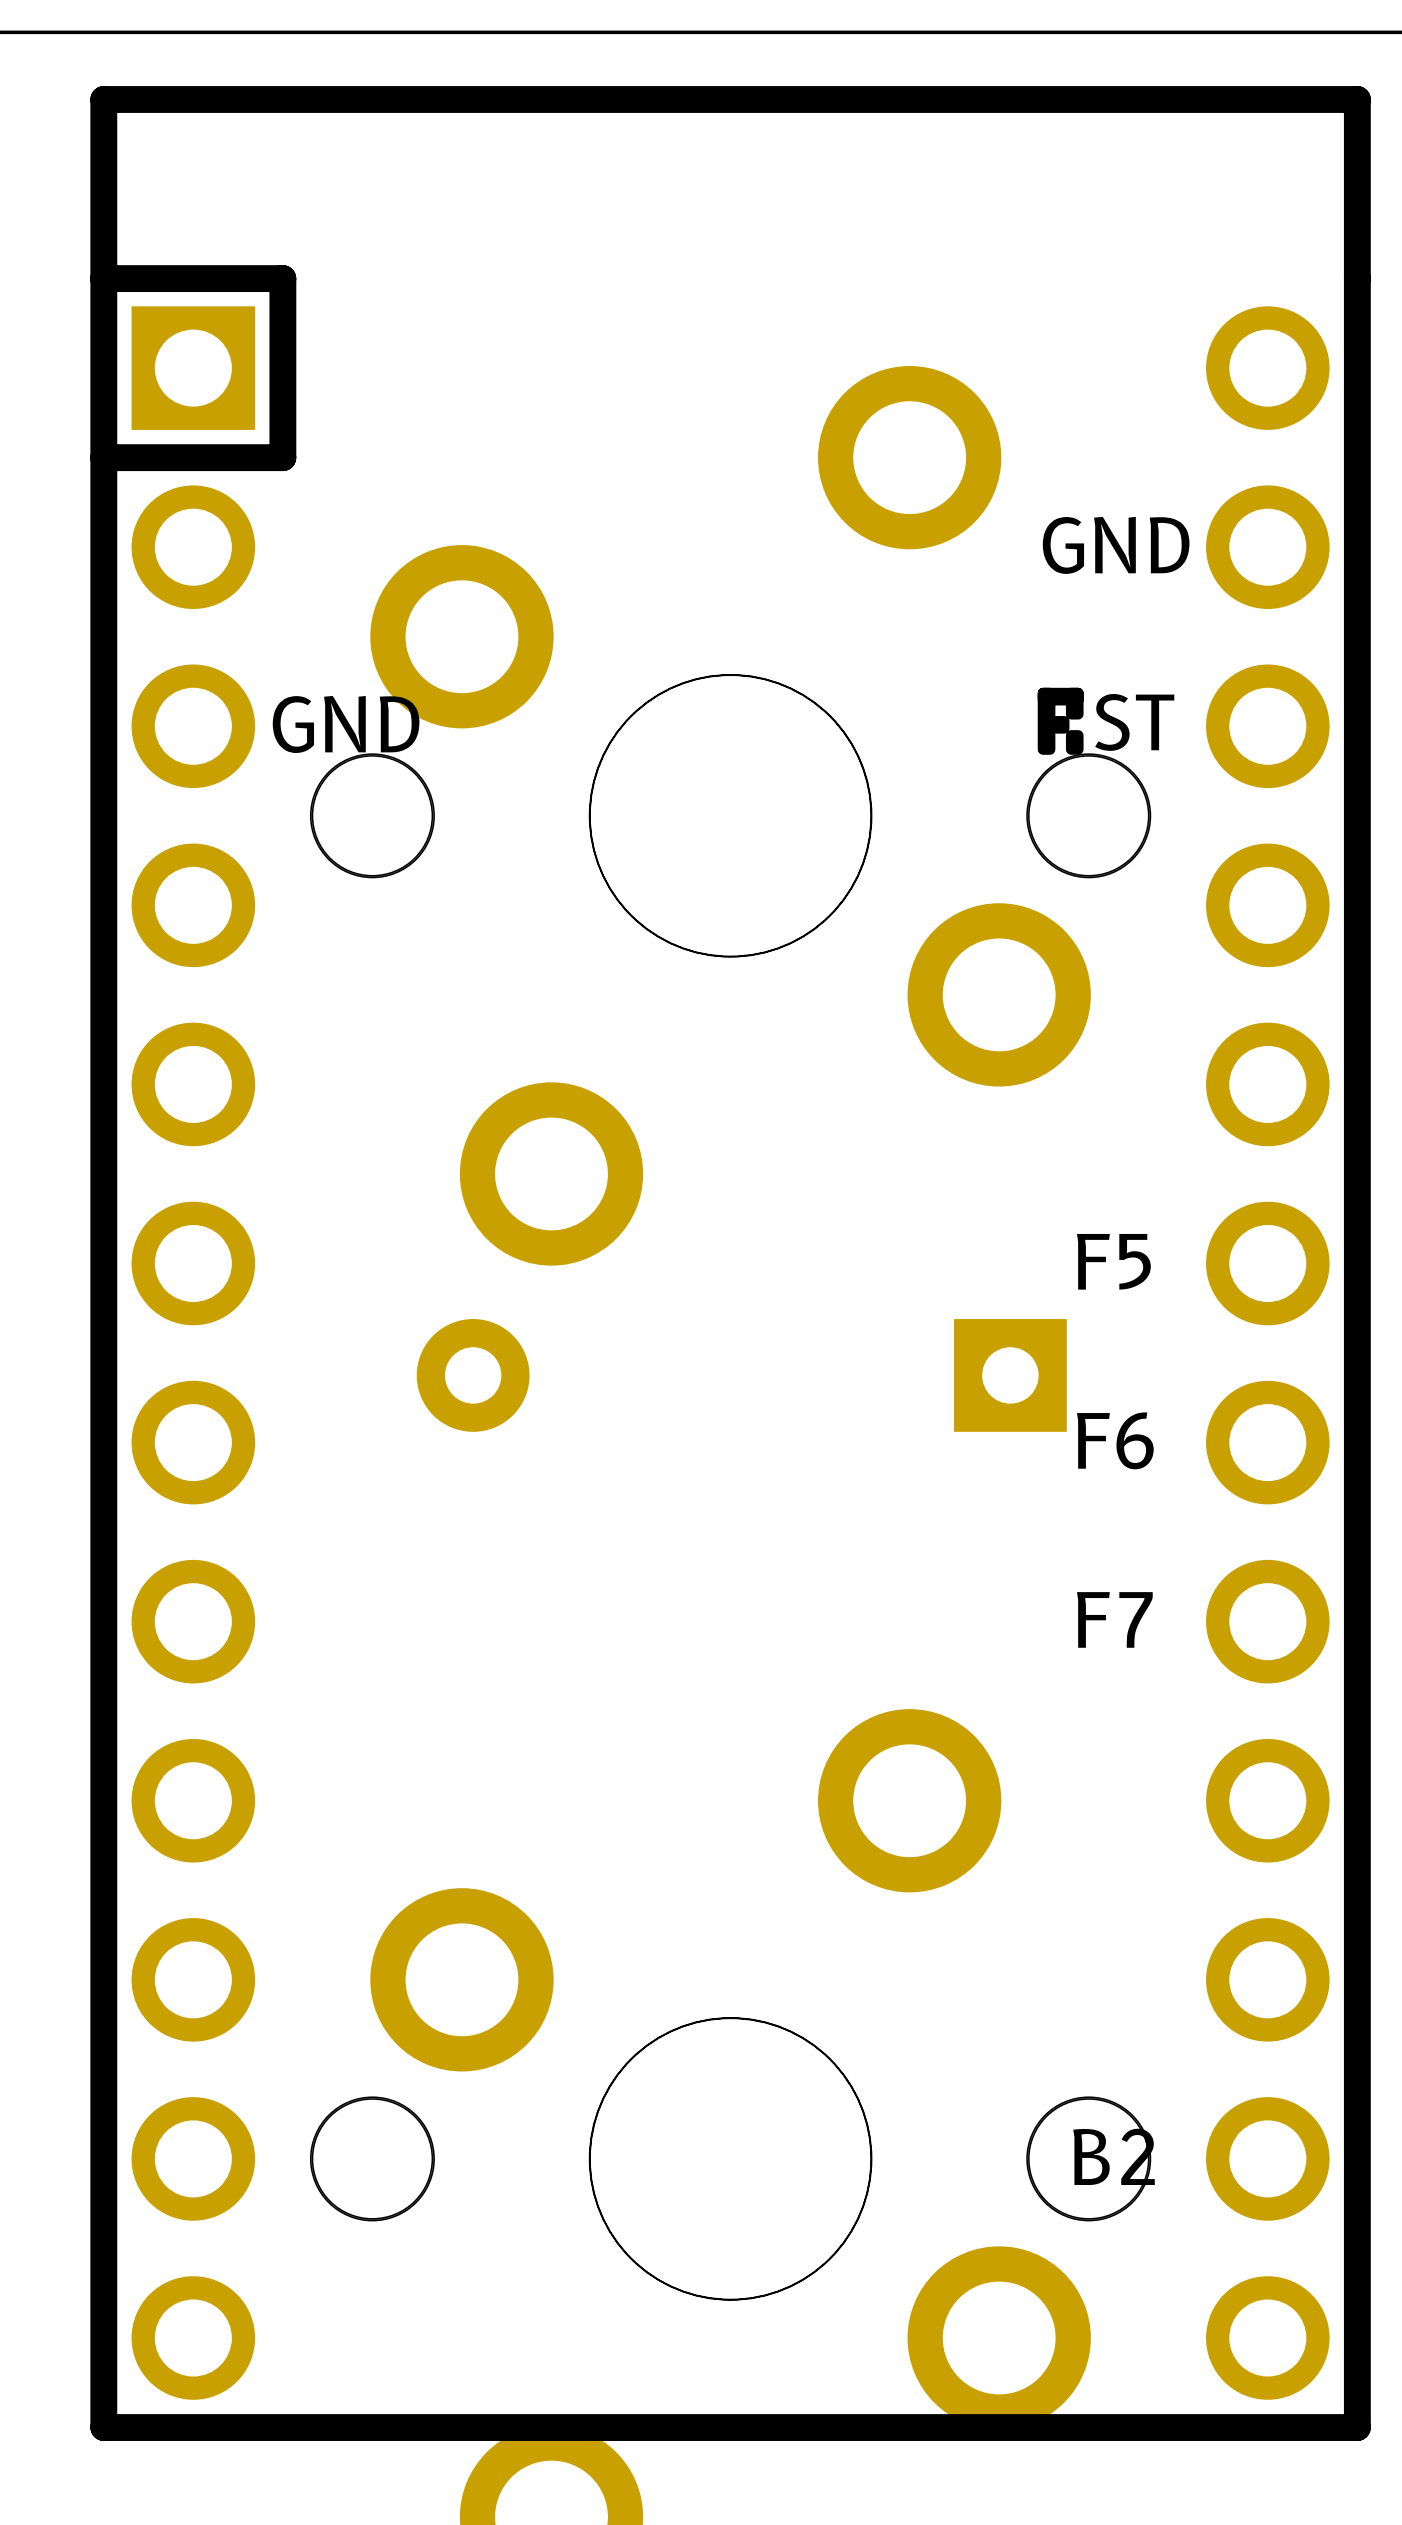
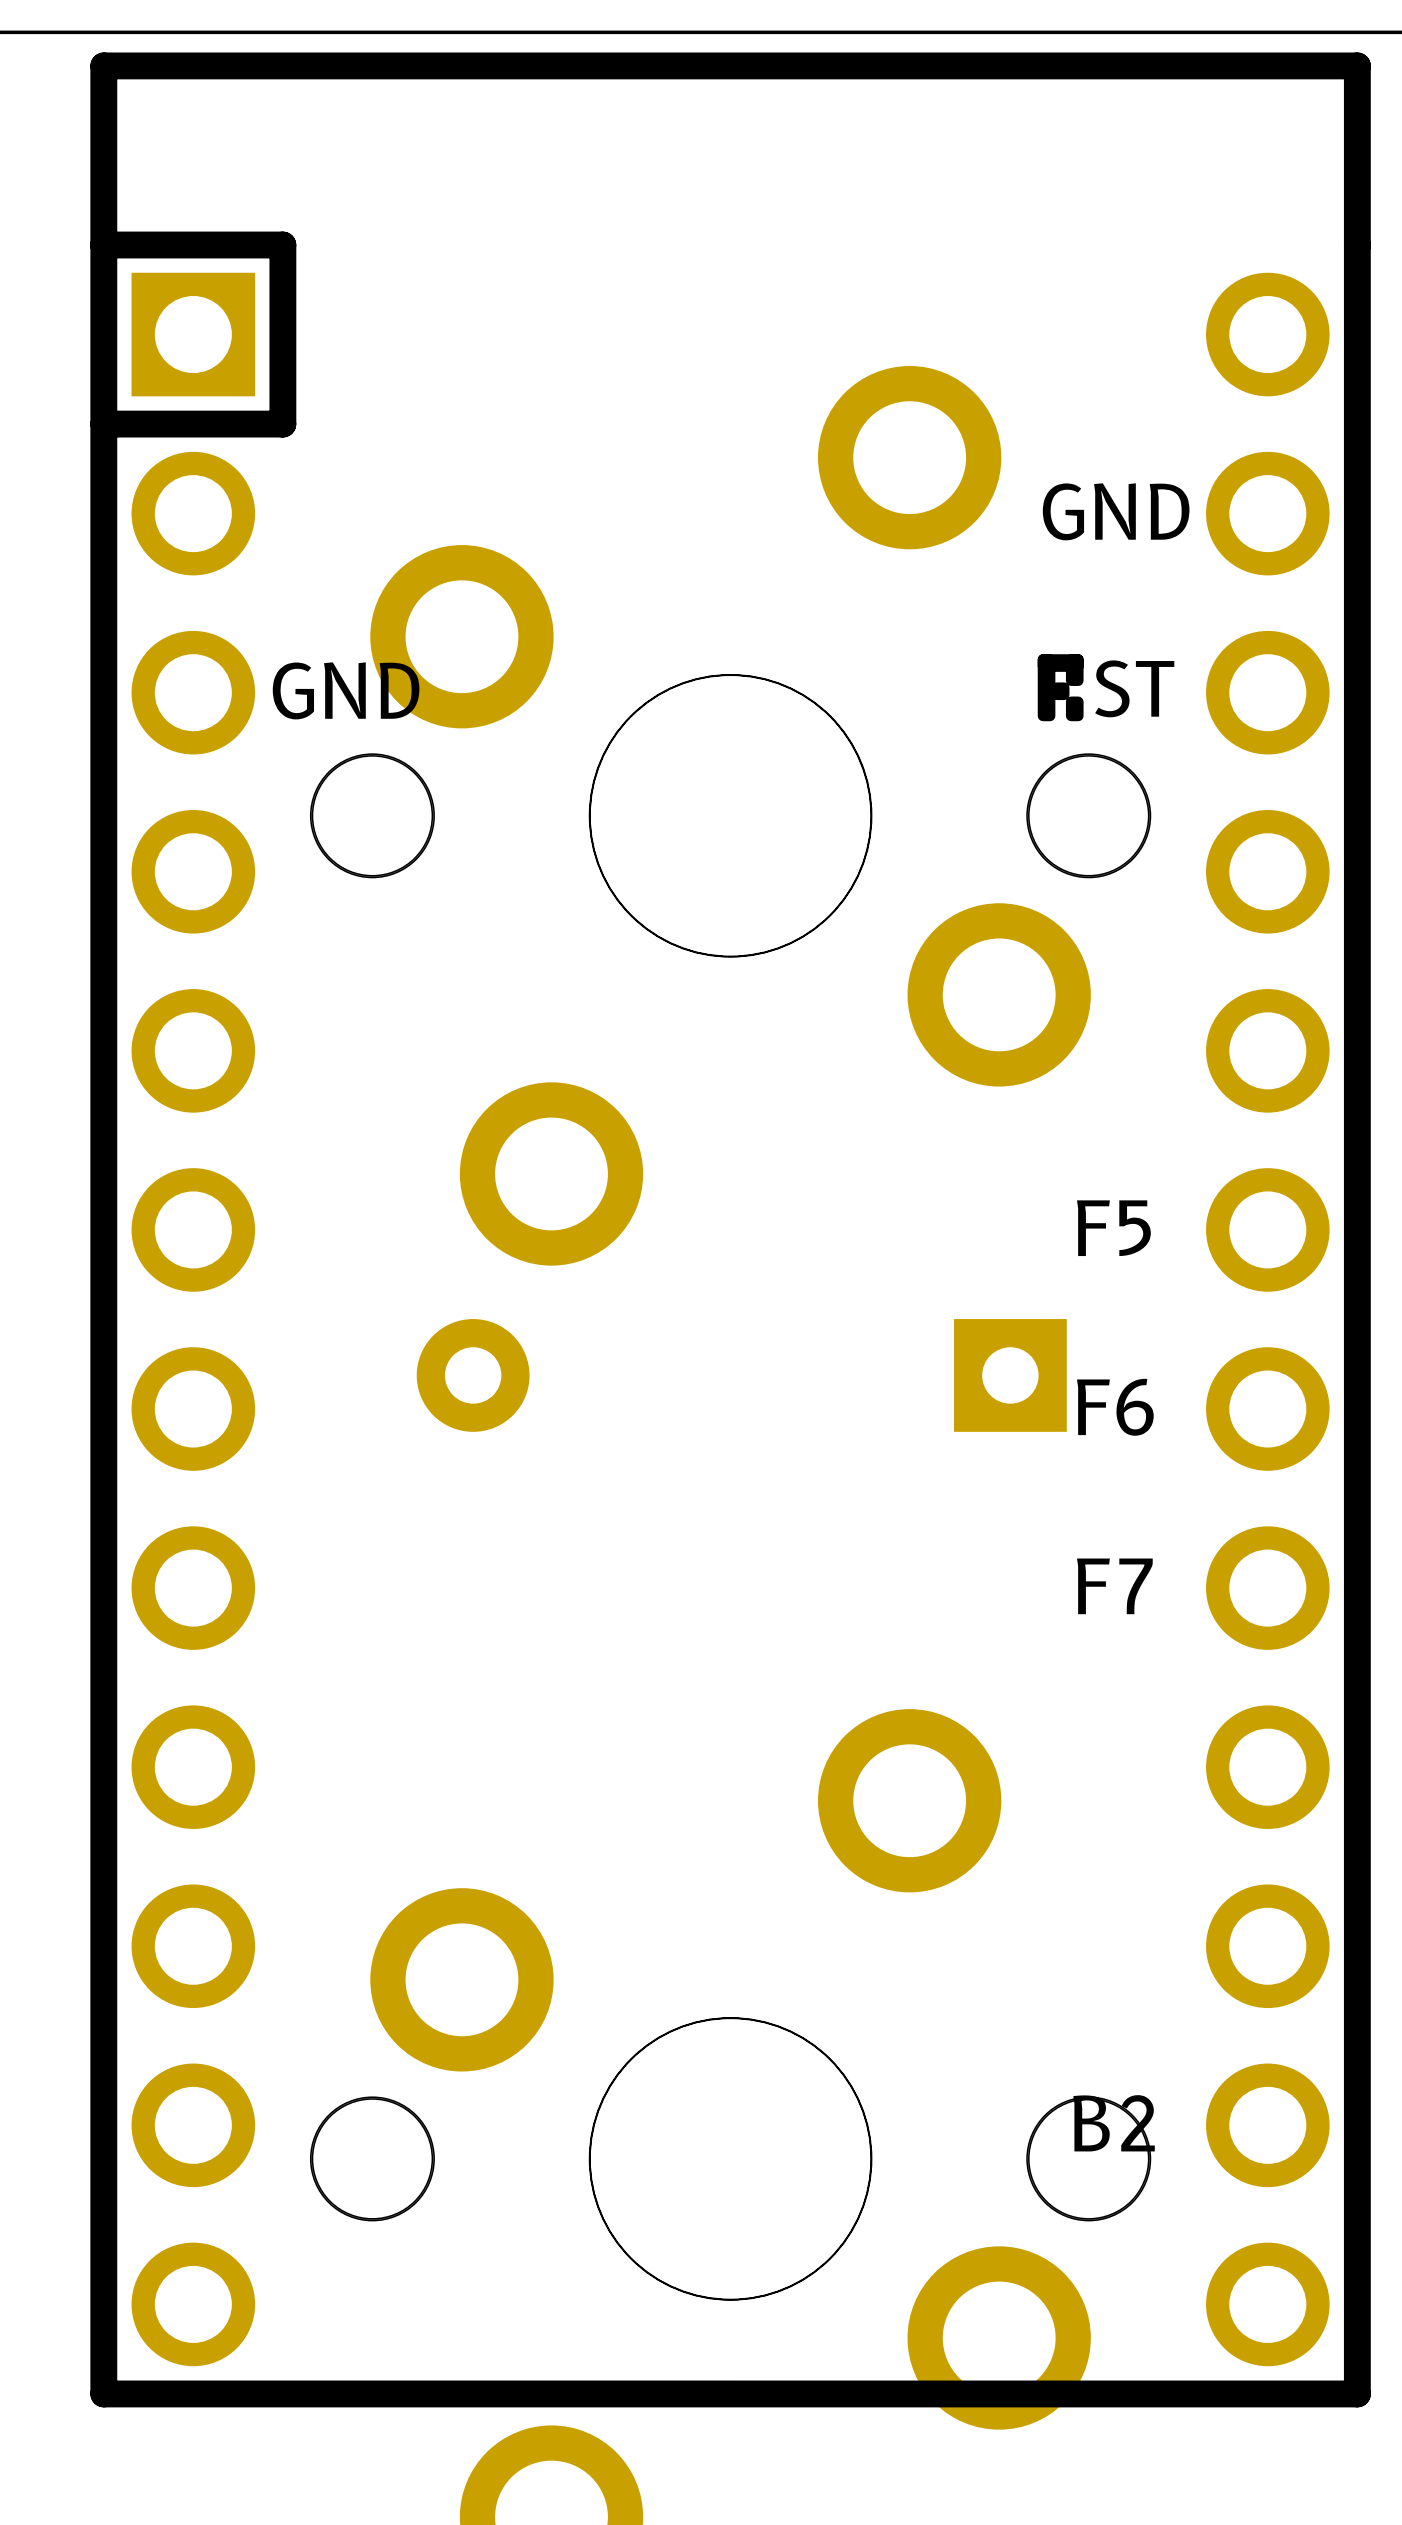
part position: (730, 1263) -> (730, 1229)

